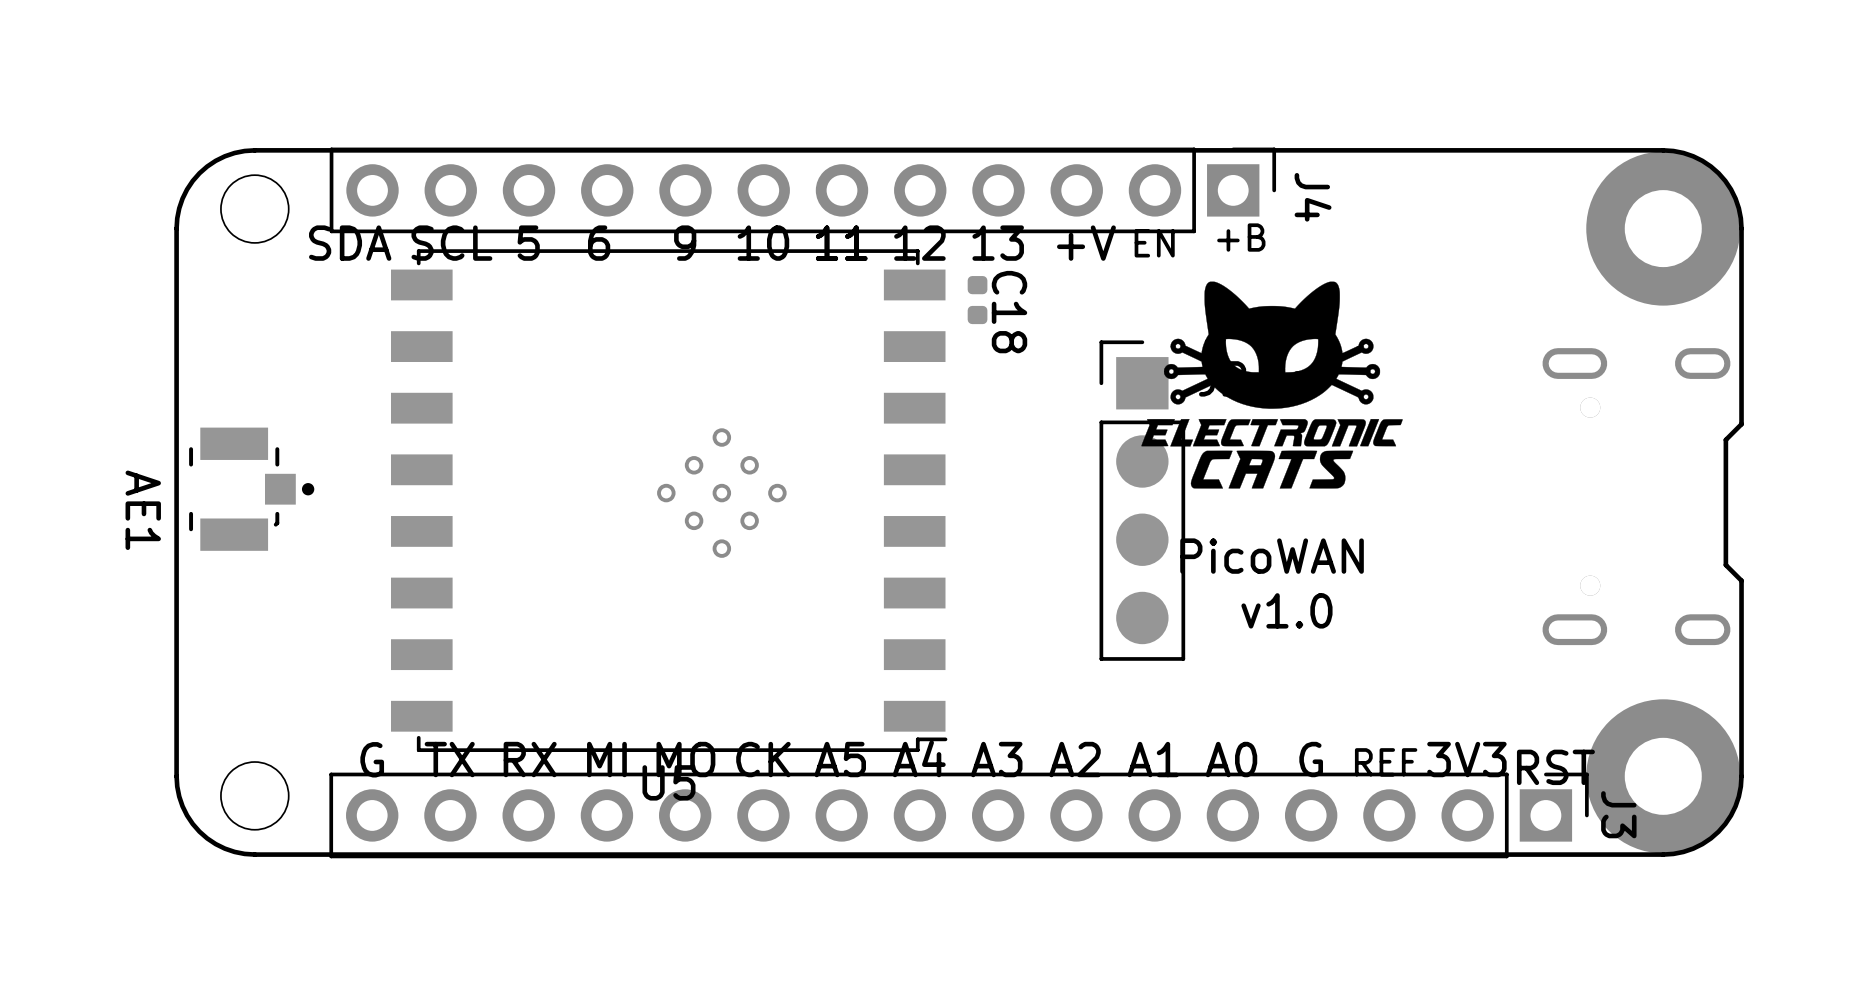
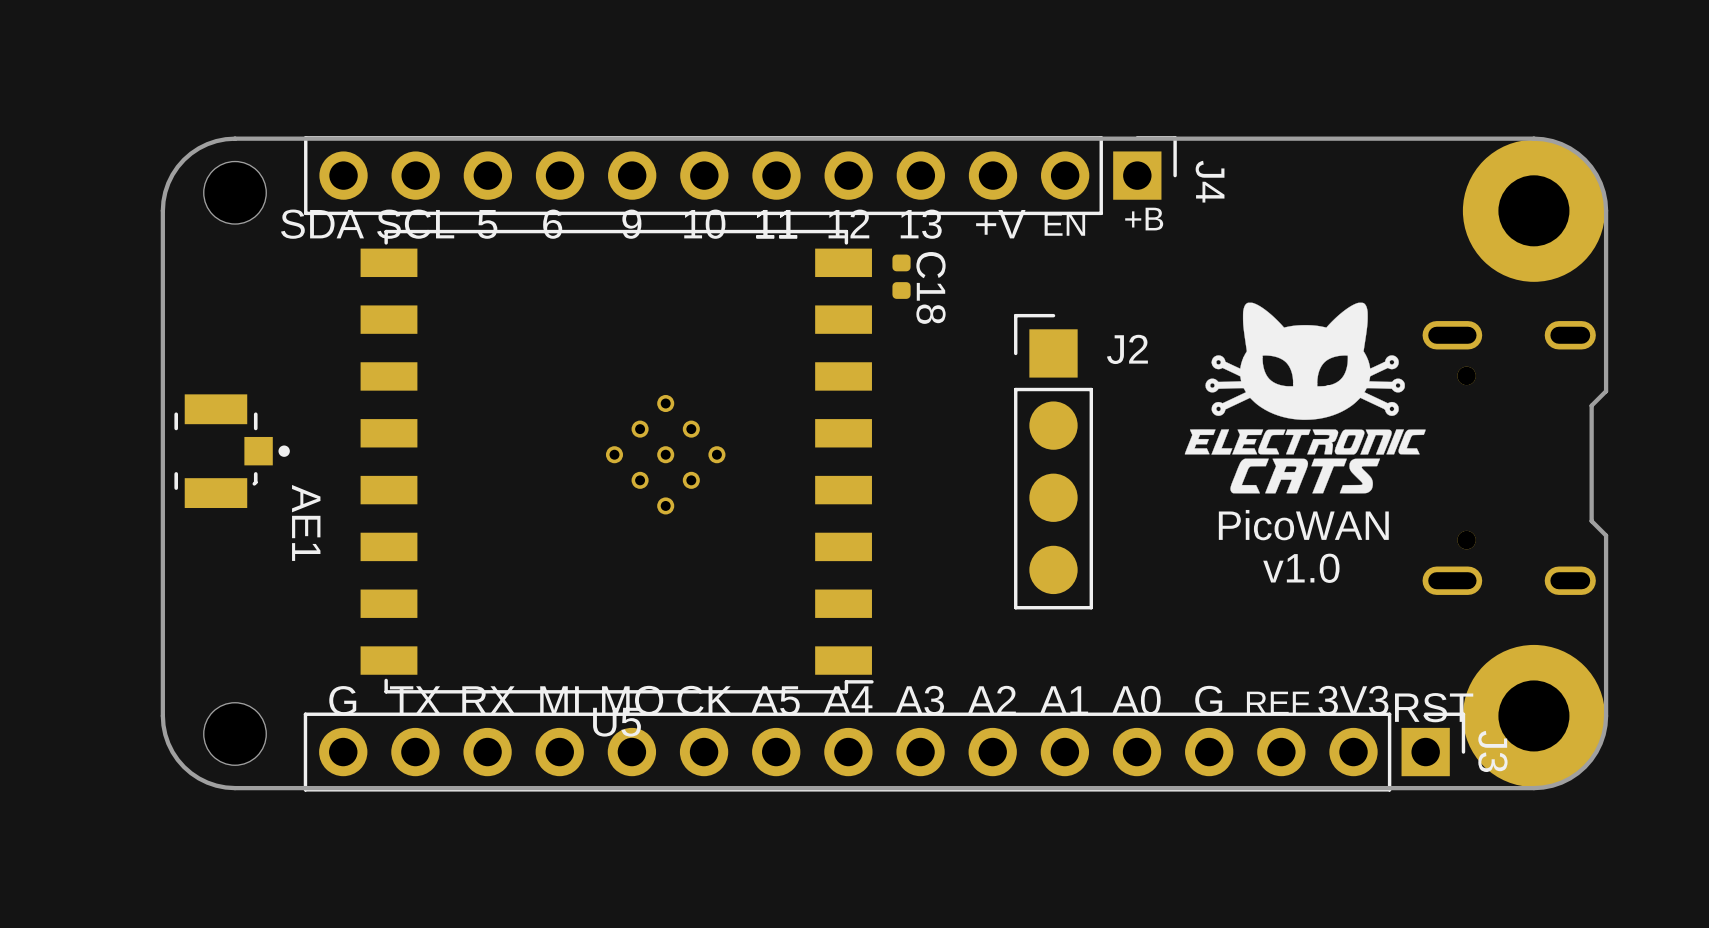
drawing position: (1272, 385) -> (1305, 398)
AE1 name position: AE1 (143, 510) -> AE1 (306, 522)
text position: PicoWAN (1272, 556) -> PicoWAN (1303, 525)
text position: v1.0 (1286, 610) -> v1.0 (1301, 568)

